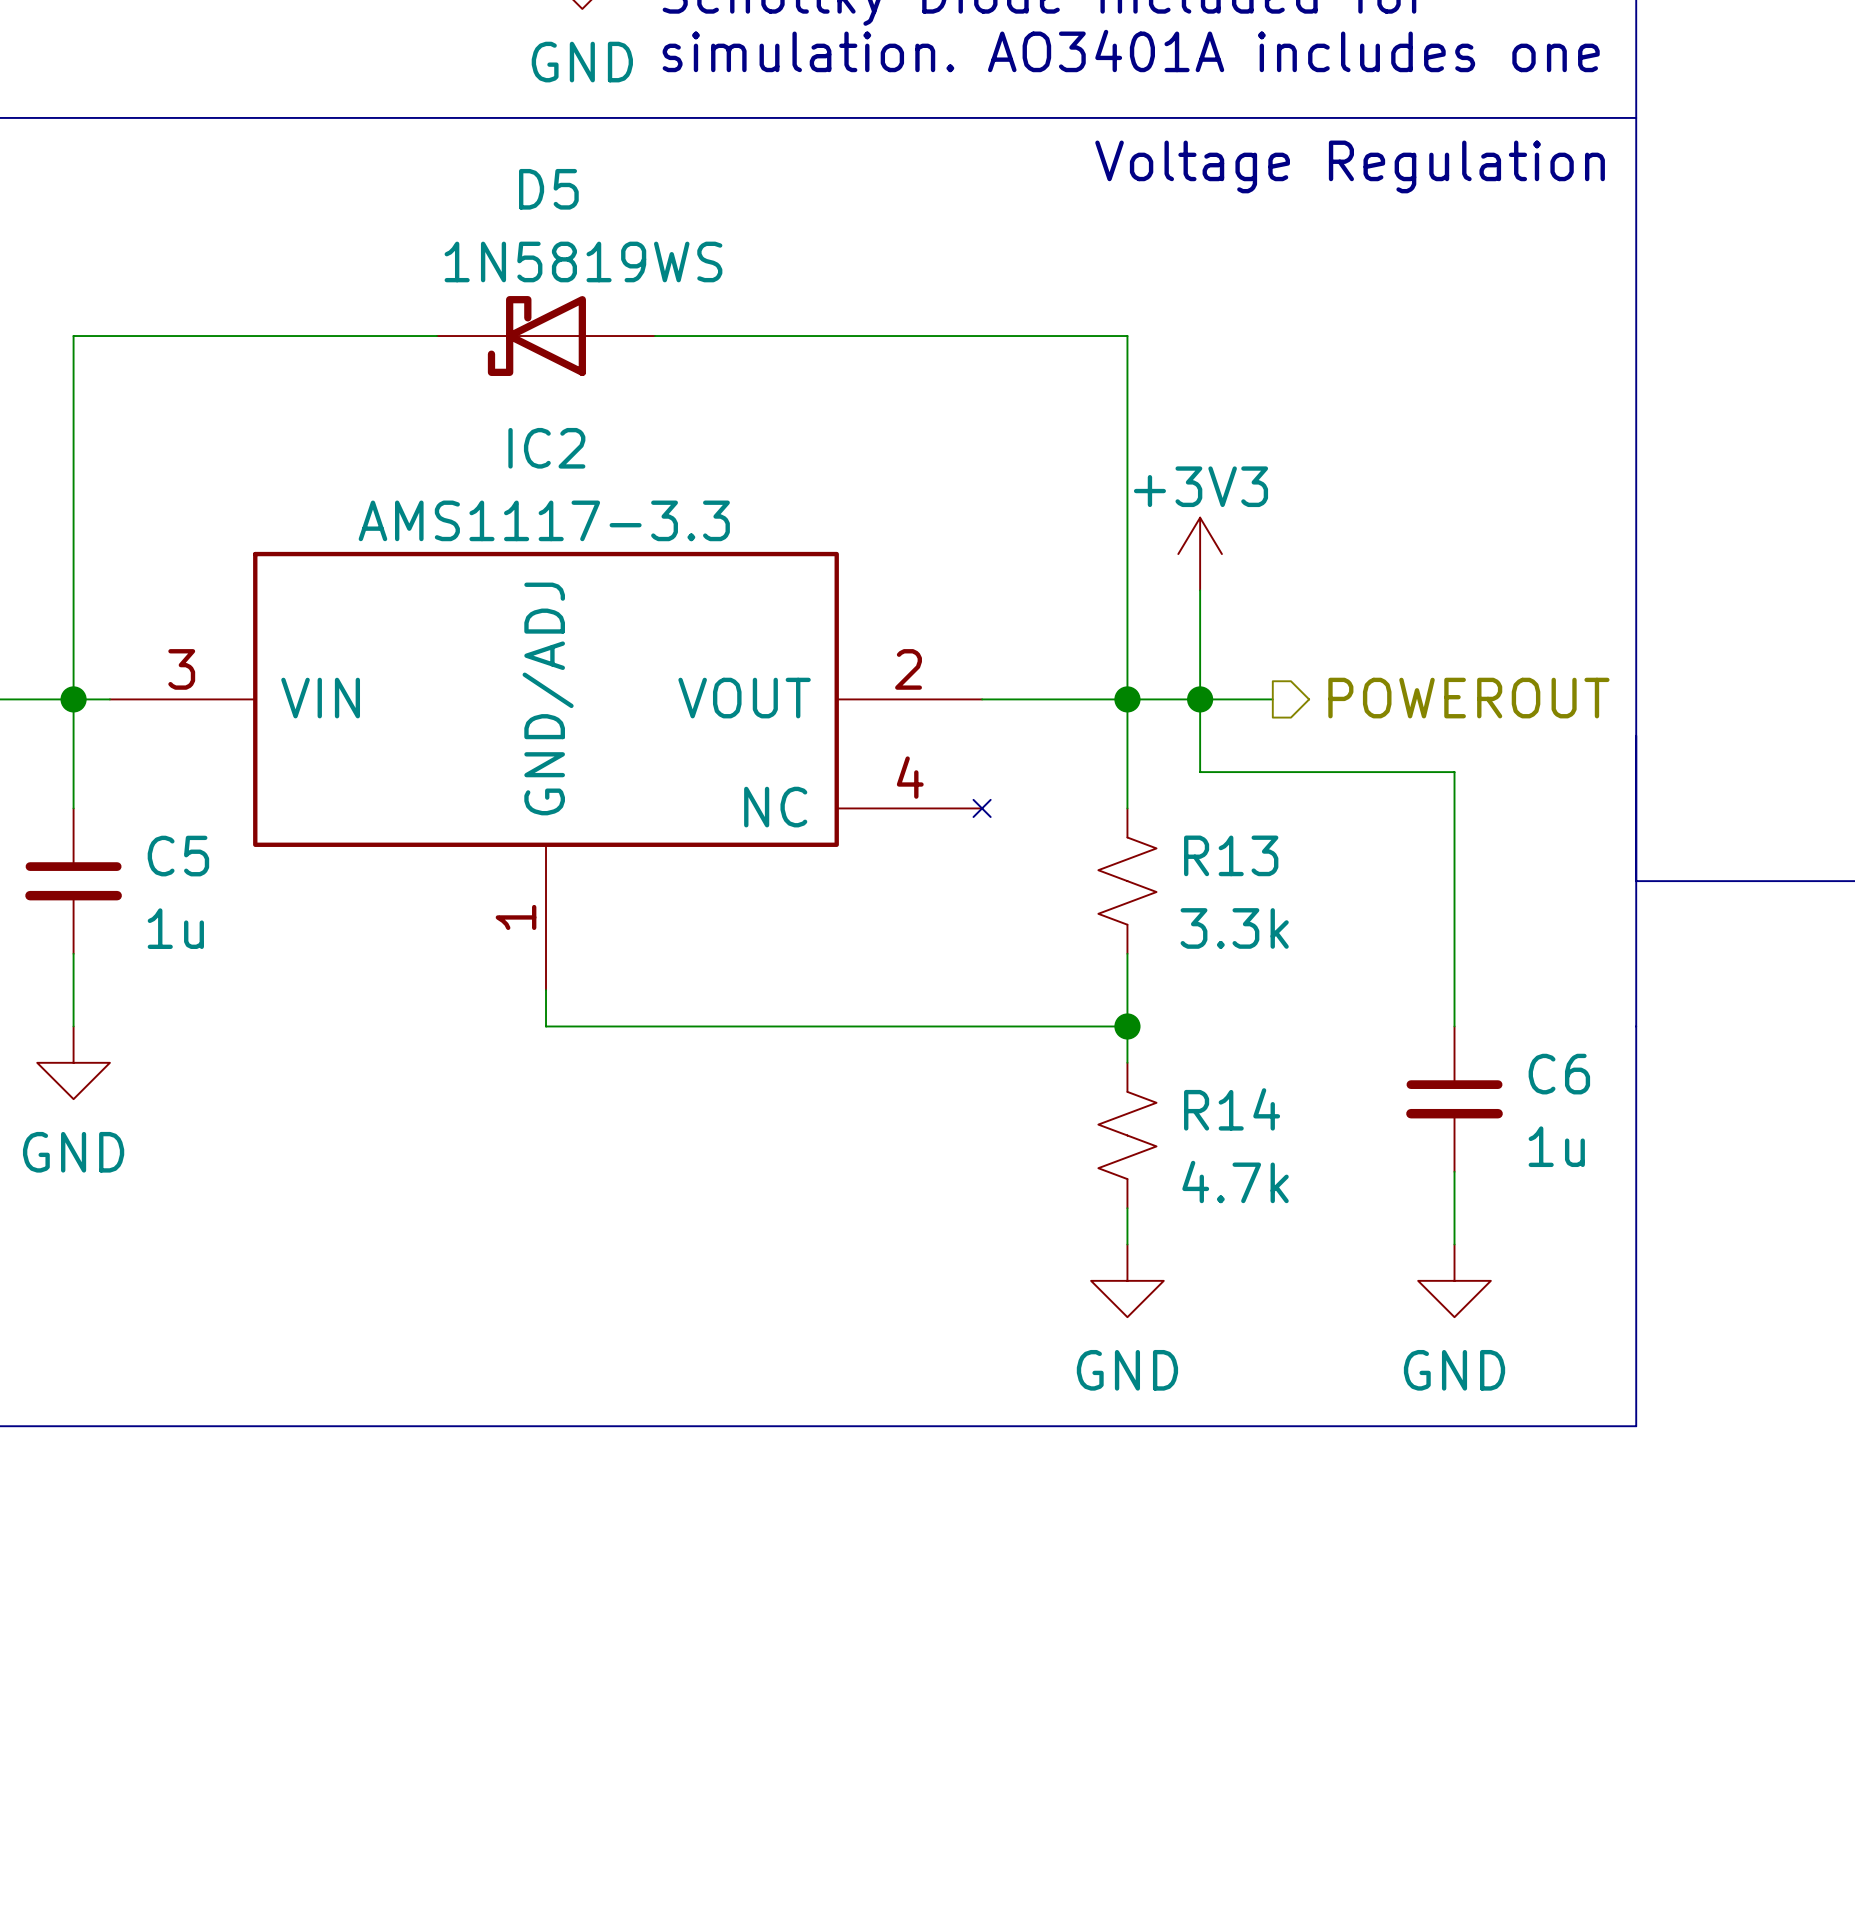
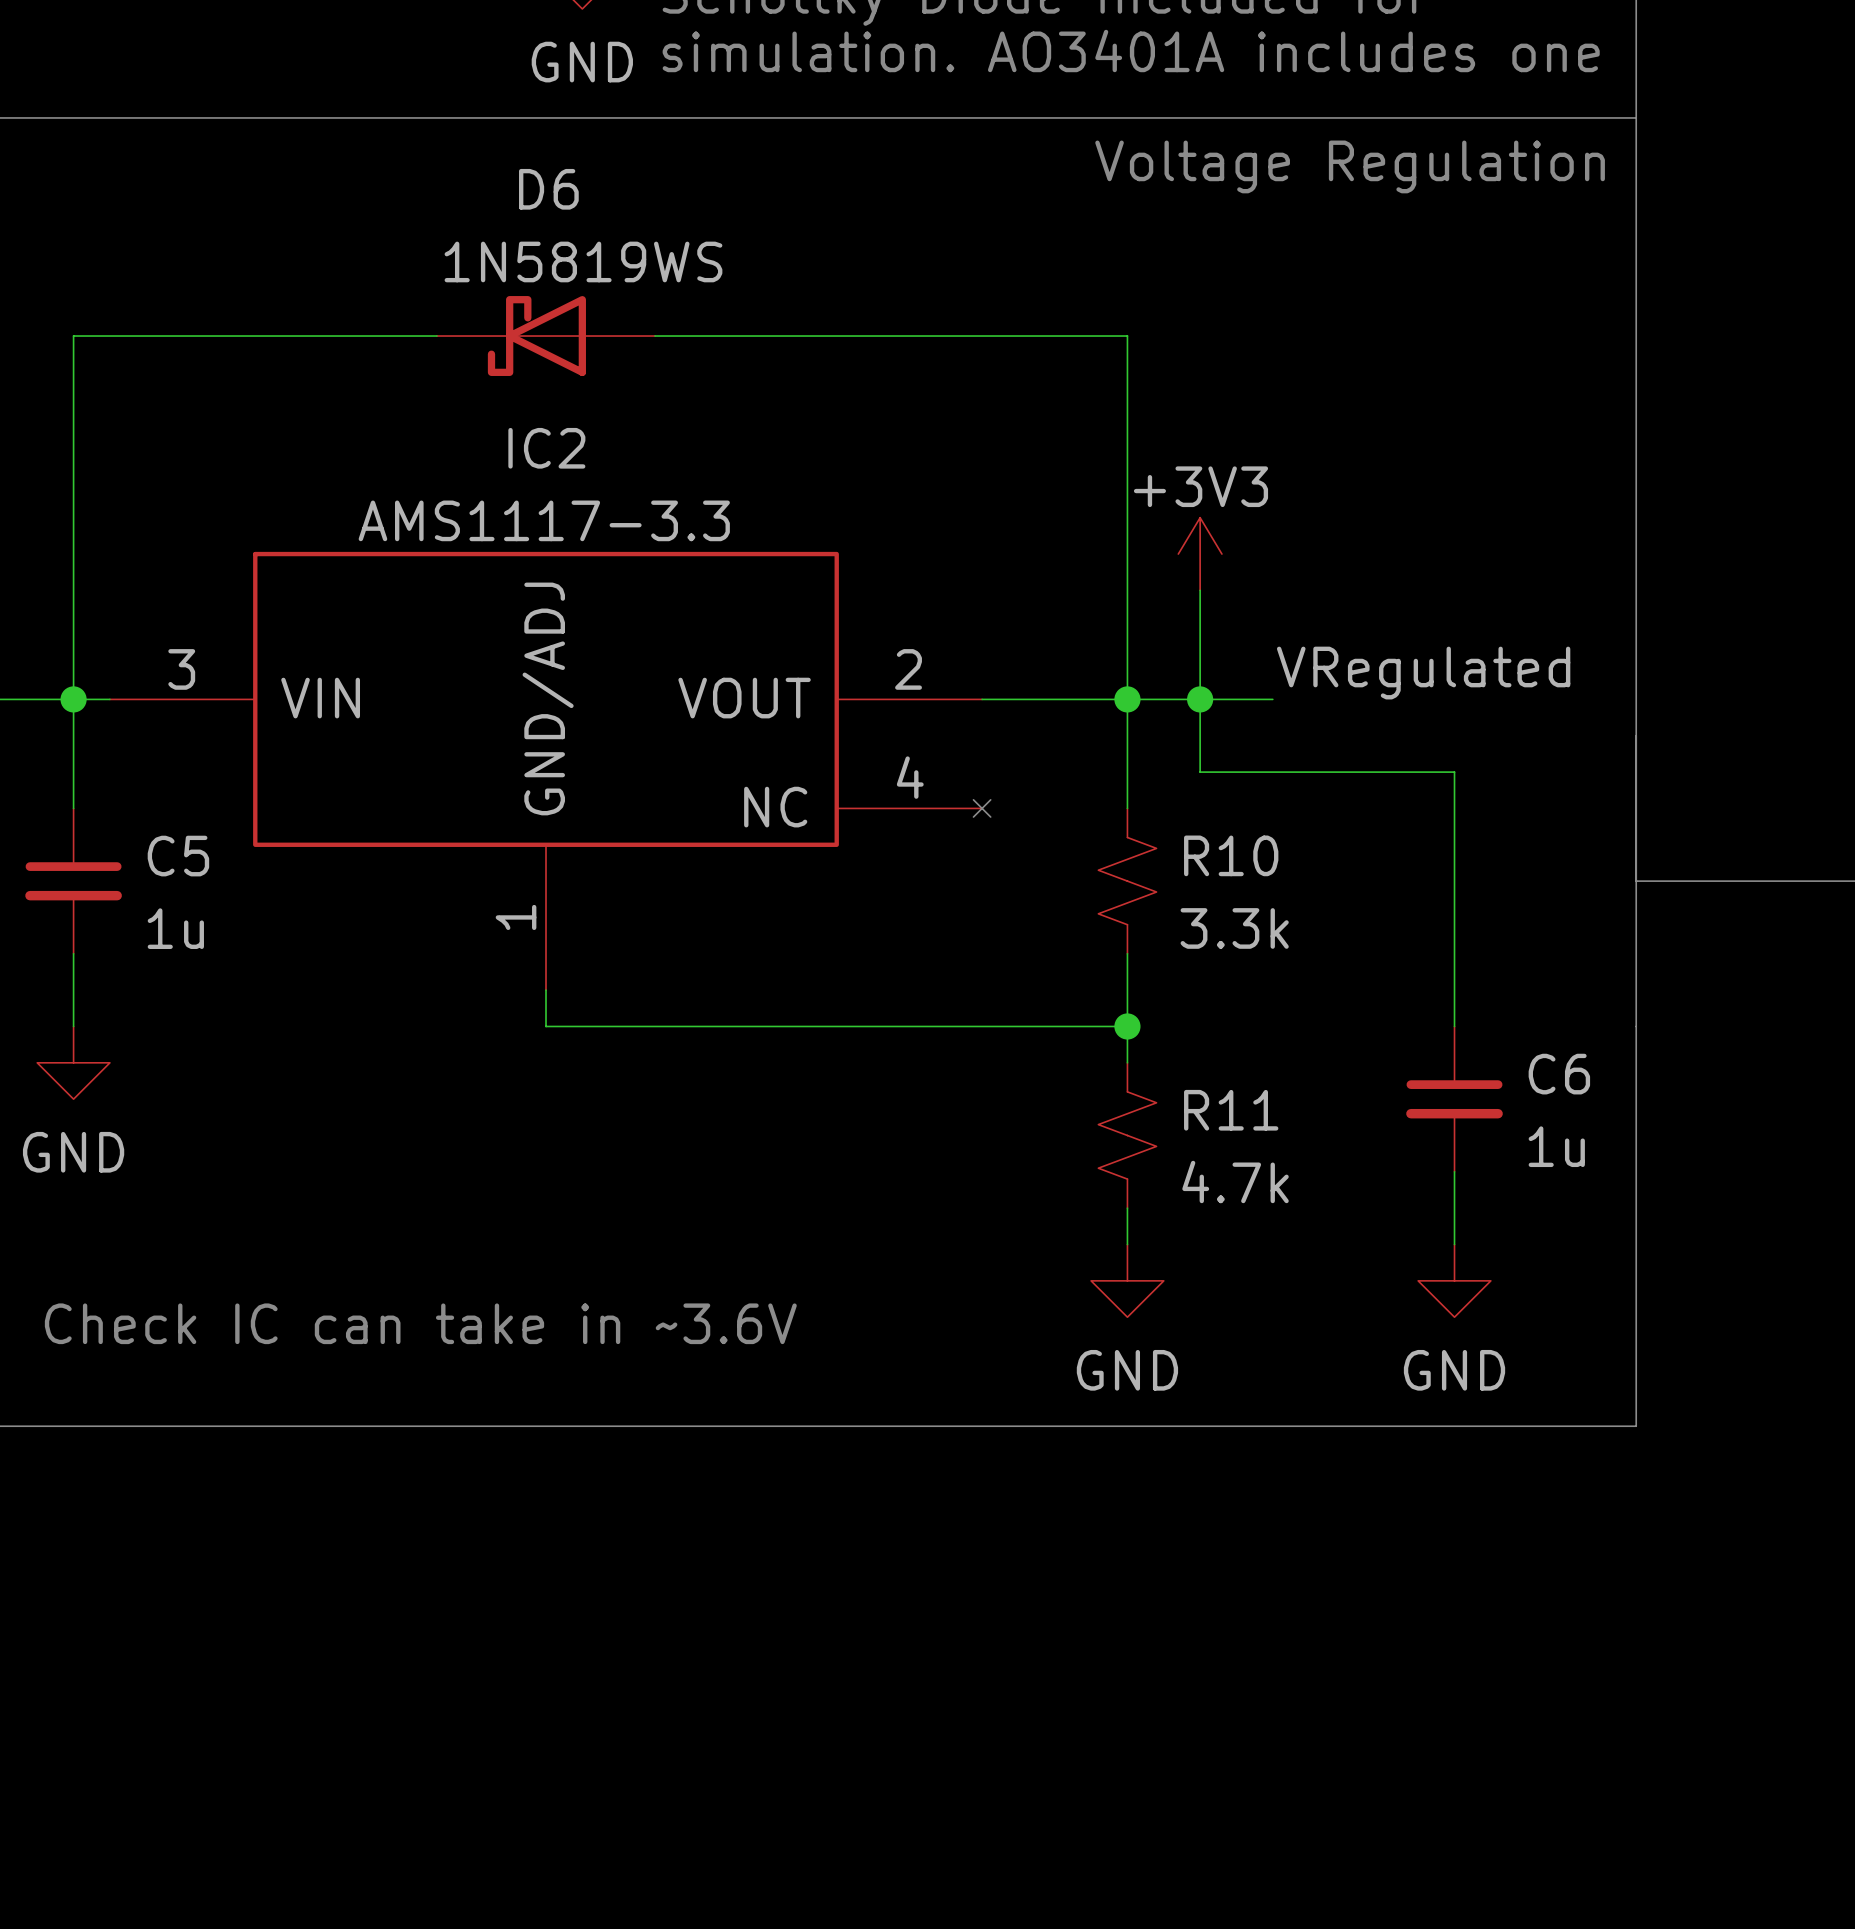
D5 name: D5 (548, 189) -> D6 (548, 189)
label: none -> VRegulated (1423, 673)
hierarchical label: POWEROUT (1468, 698) -> none
R13 name: R13 (1231, 855) -> R10 (1231, 855)
R14 name: R14 (1232, 1109) -> R11 (1231, 1110)
text: none -> Check IC can take in ~3.6V (420, 1323)

